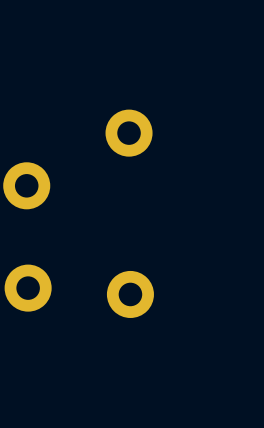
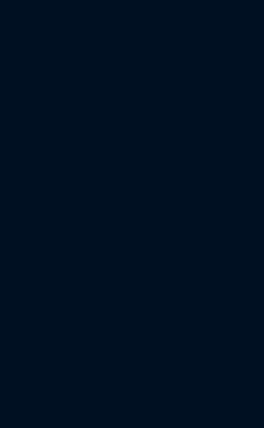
part: (129, 133) -> none
part: (26, 185) -> none
part: (28, 288) -> none
part: (130, 294) -> none

